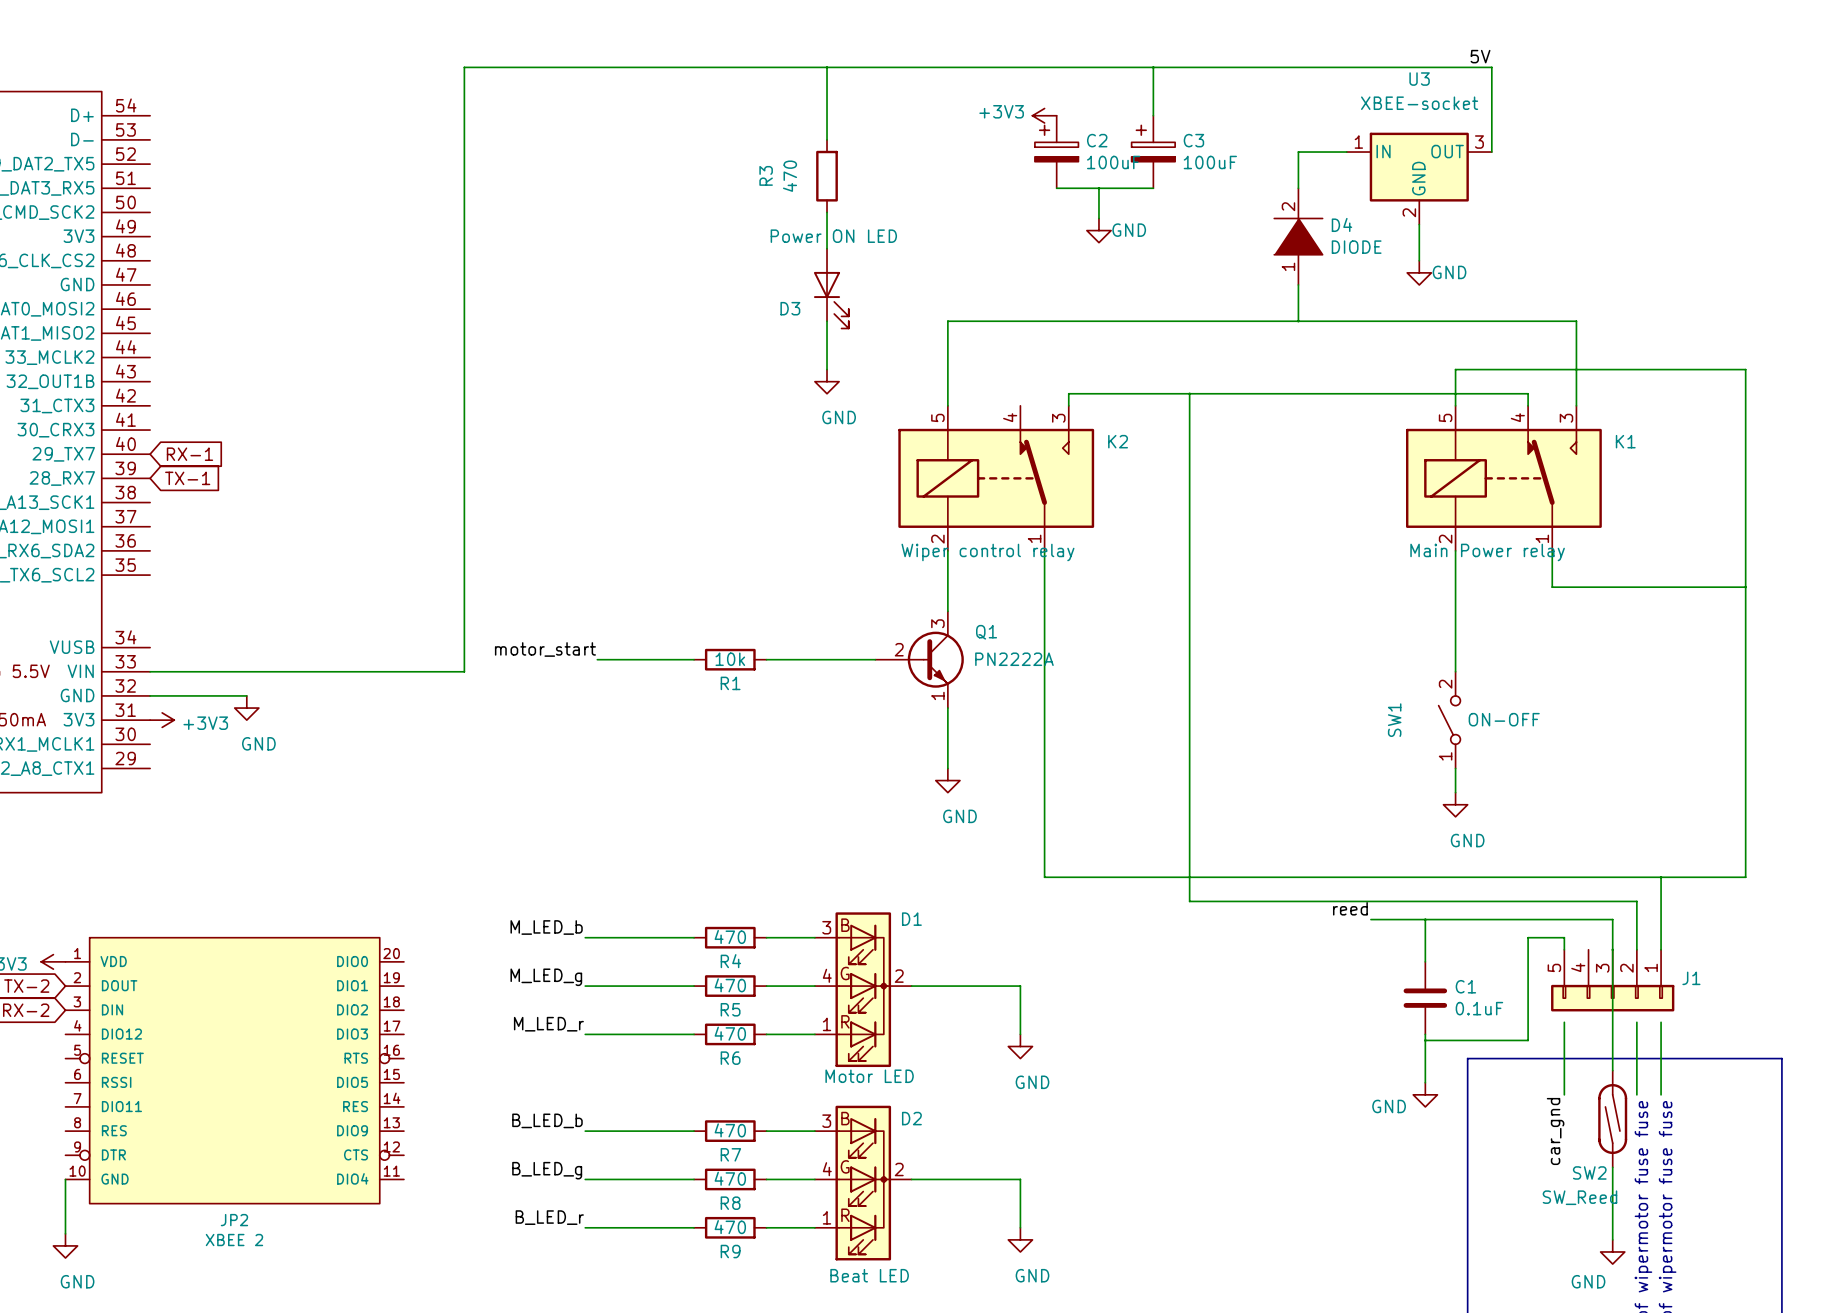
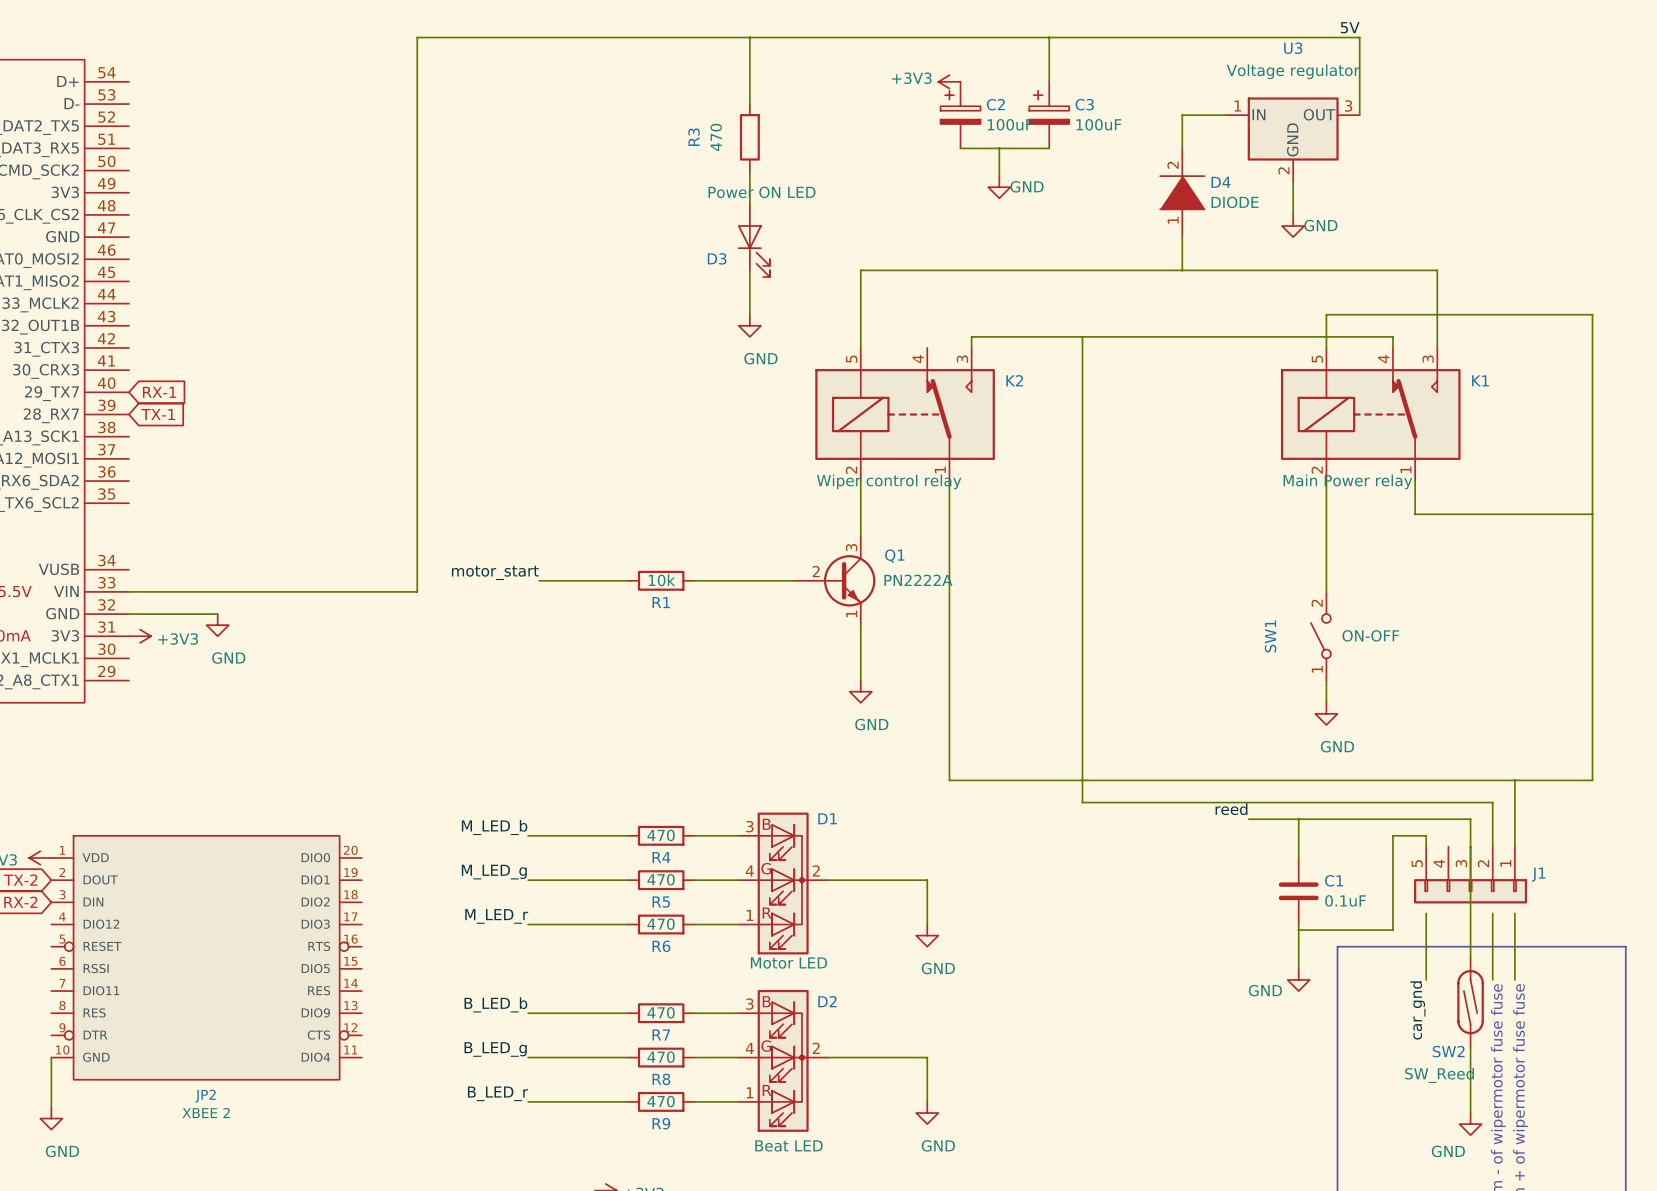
U3 value: XBEE-socket (1419, 103) -> Voltage regulator (1293, 71)

